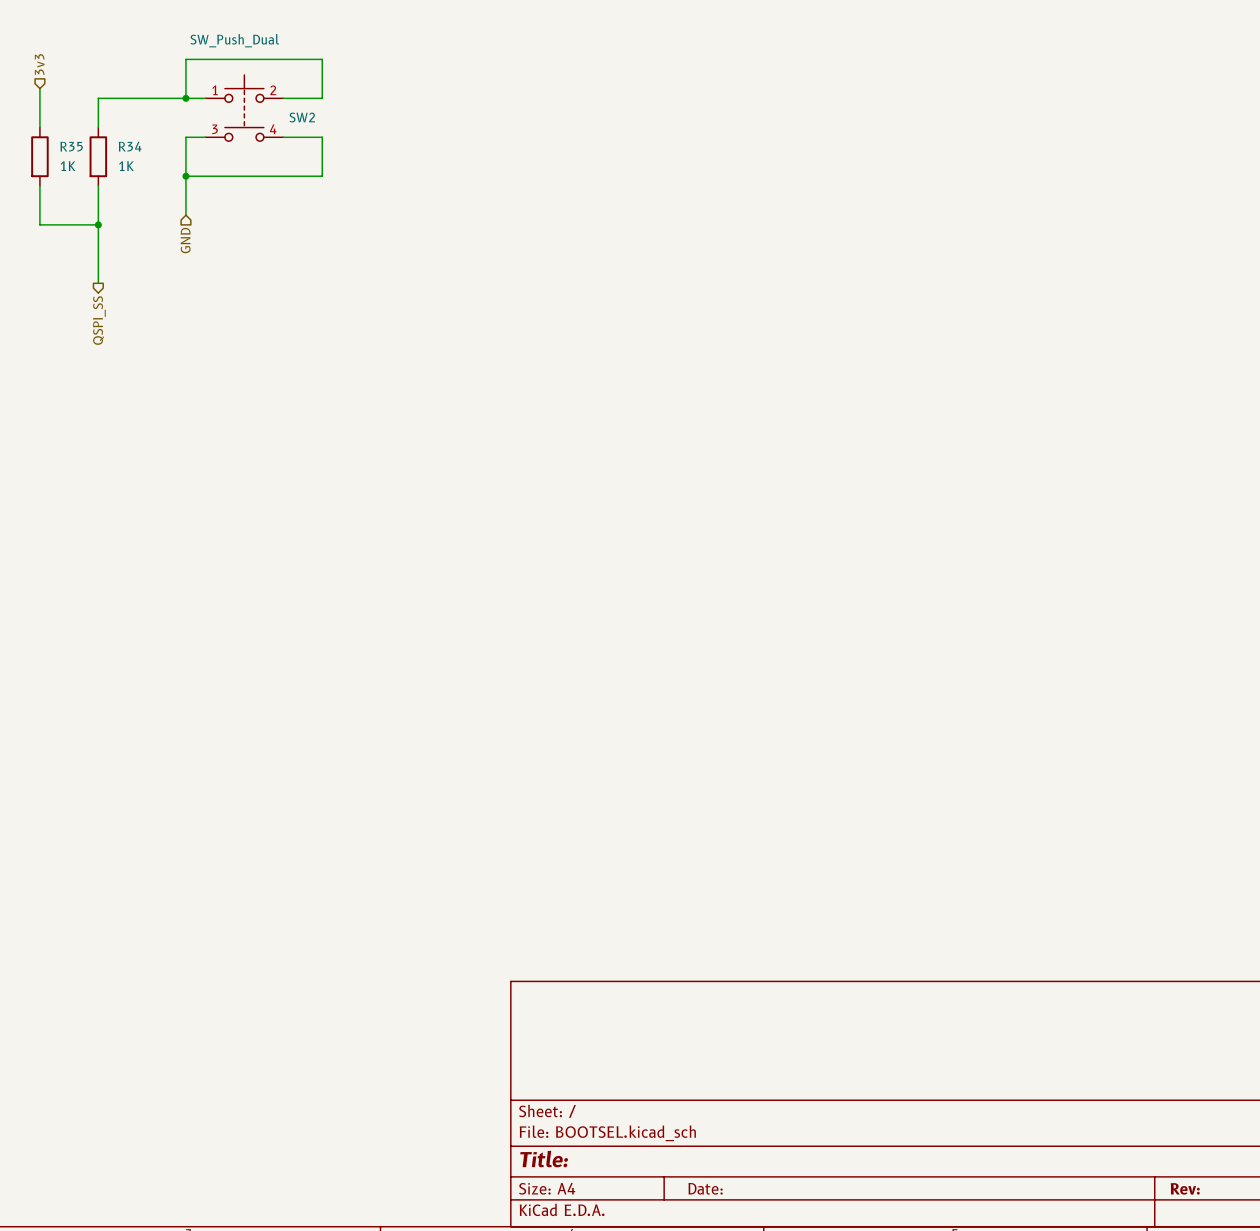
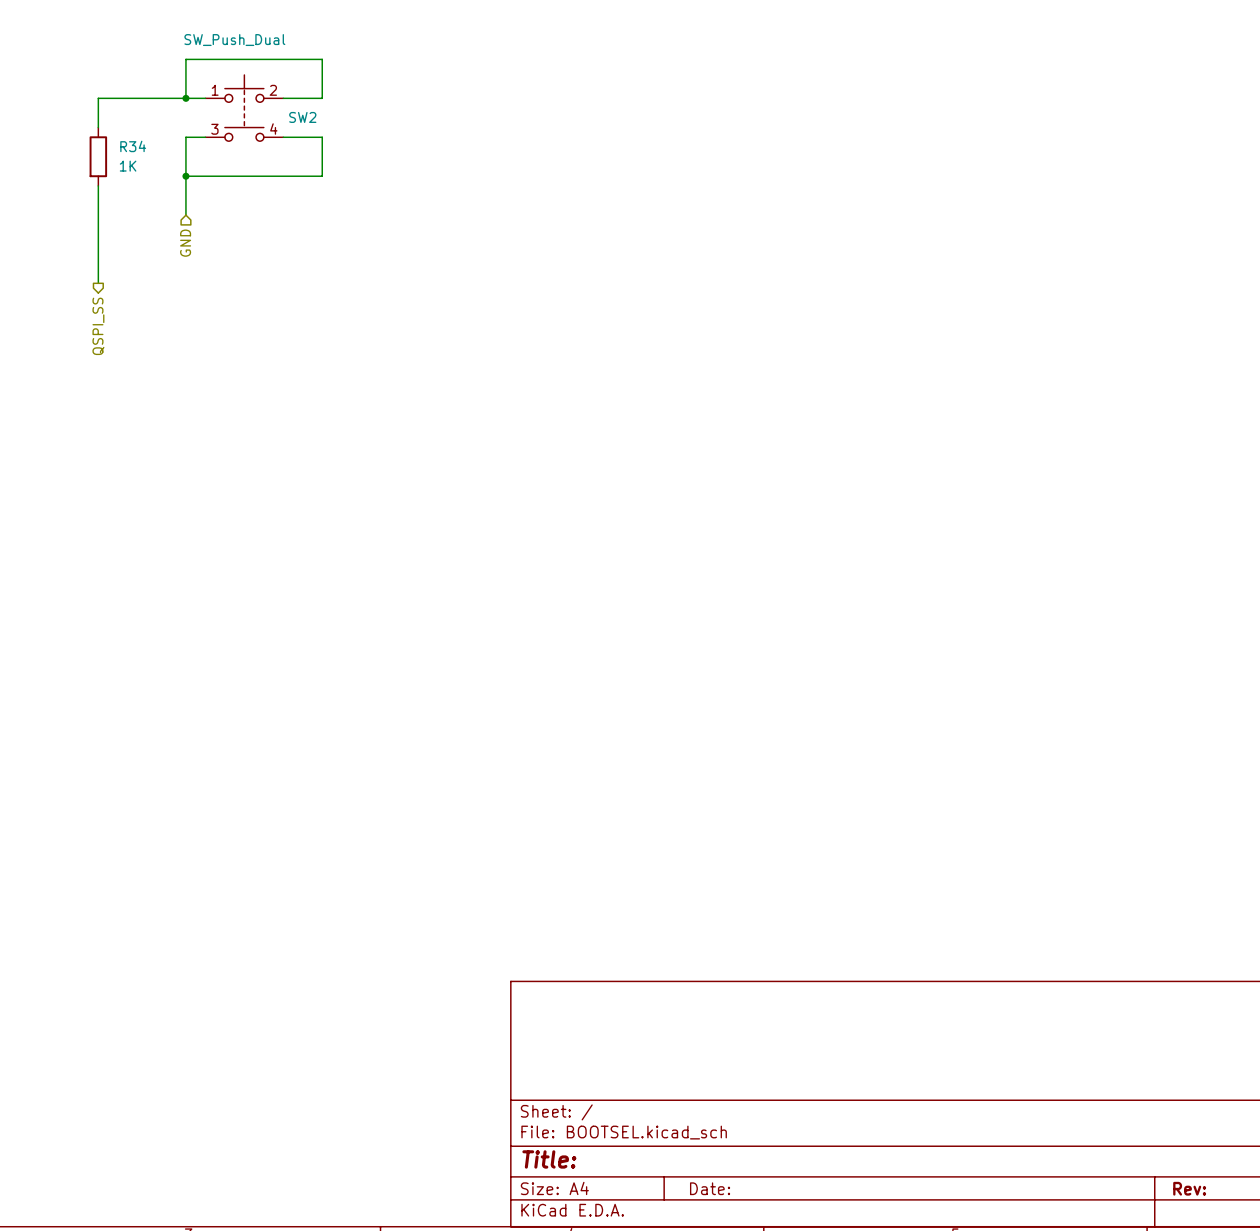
hierarchical label: 3v3 (39, 64) -> none
wire: (39, 88) (39, 127) -> none
R35: 1K (39, 156) -> none
wire: (39, 185) (39, 224) (98, 224) -> none
junction: (98, 224) -> none

